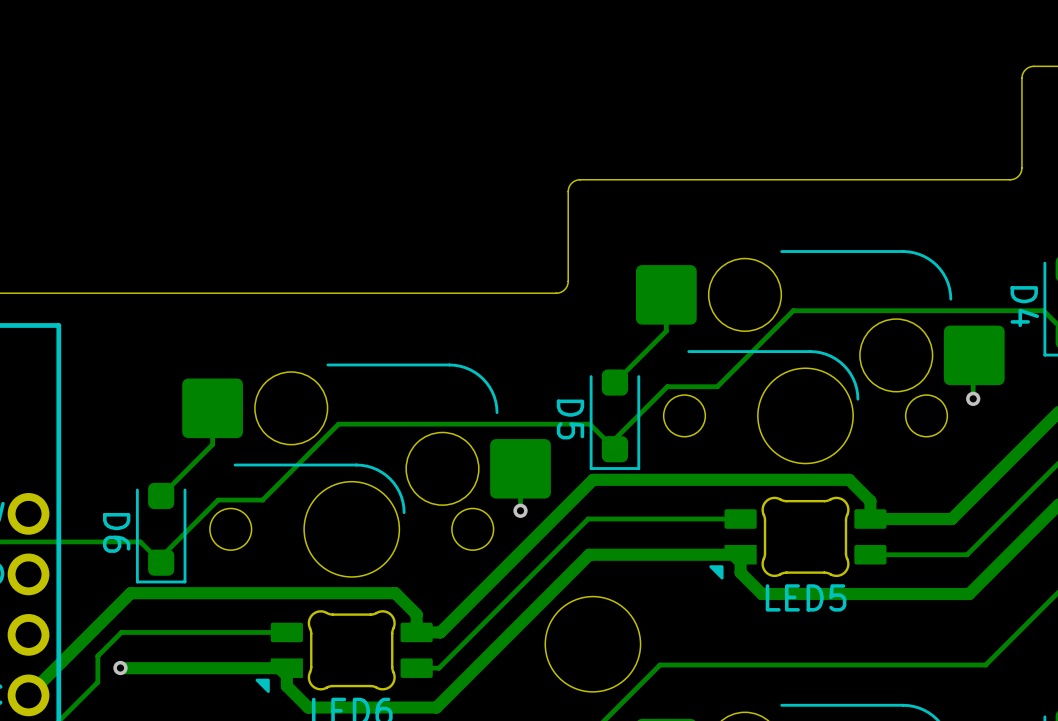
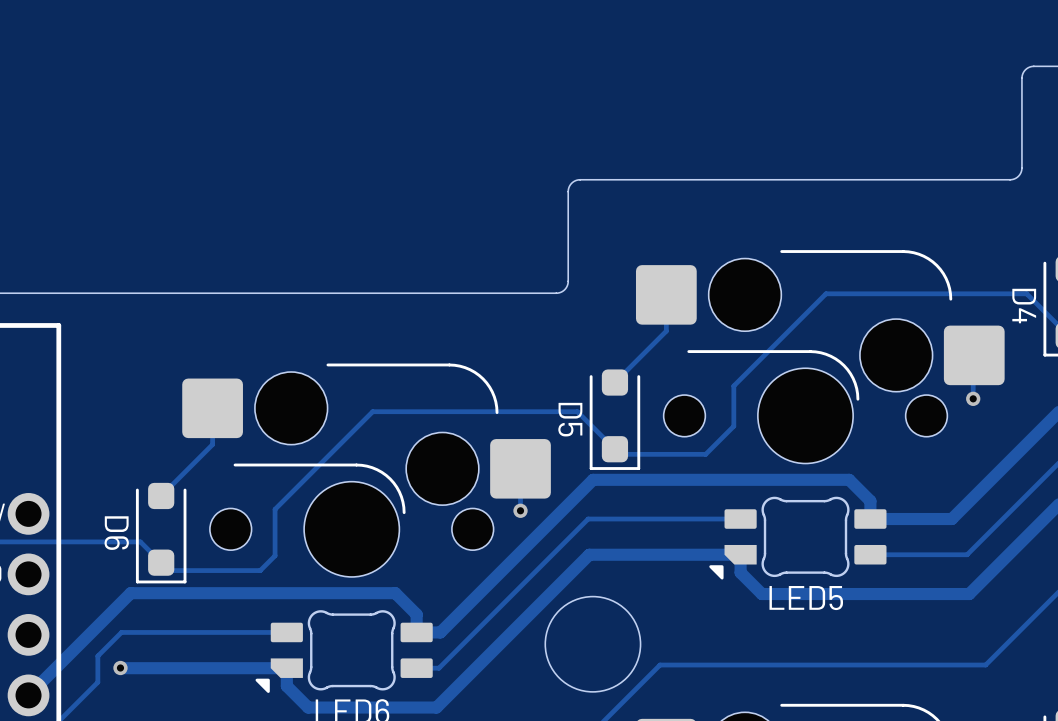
track: (1043, 310) (793, 310) (717, 386) (667, 386) (614, 439) (614, 449) -> (1043, 310) (1026, 293) (826, 293) (733, 385) (733, 426) (705, 454) (620, 454) (614, 449)
track: (589, 424) (338, 424) (262, 500) (218, 500) (161, 557) (161, 562) -> (589, 424) (577, 411) (372, 411) (275, 509) (275, 555) (260, 570) (169, 570) (161, 562)

